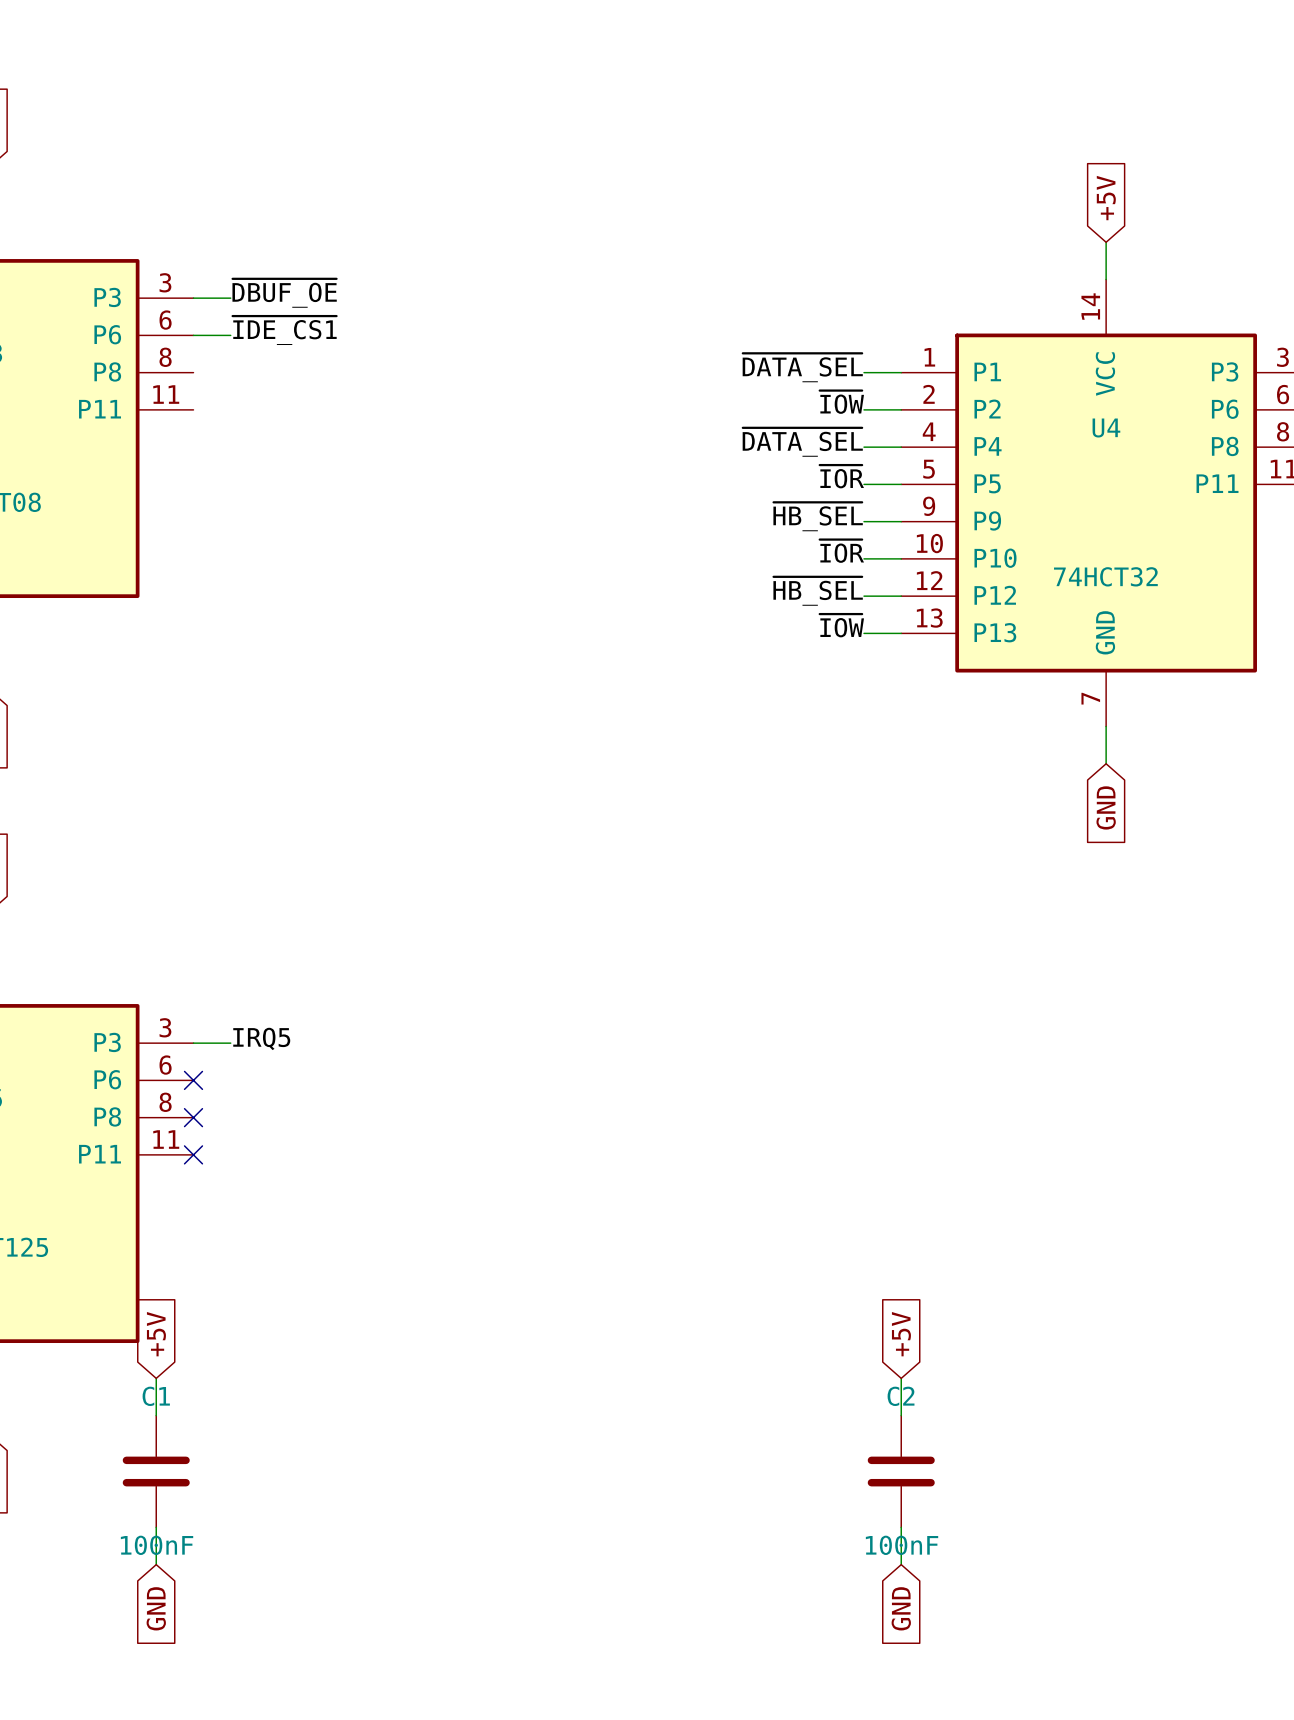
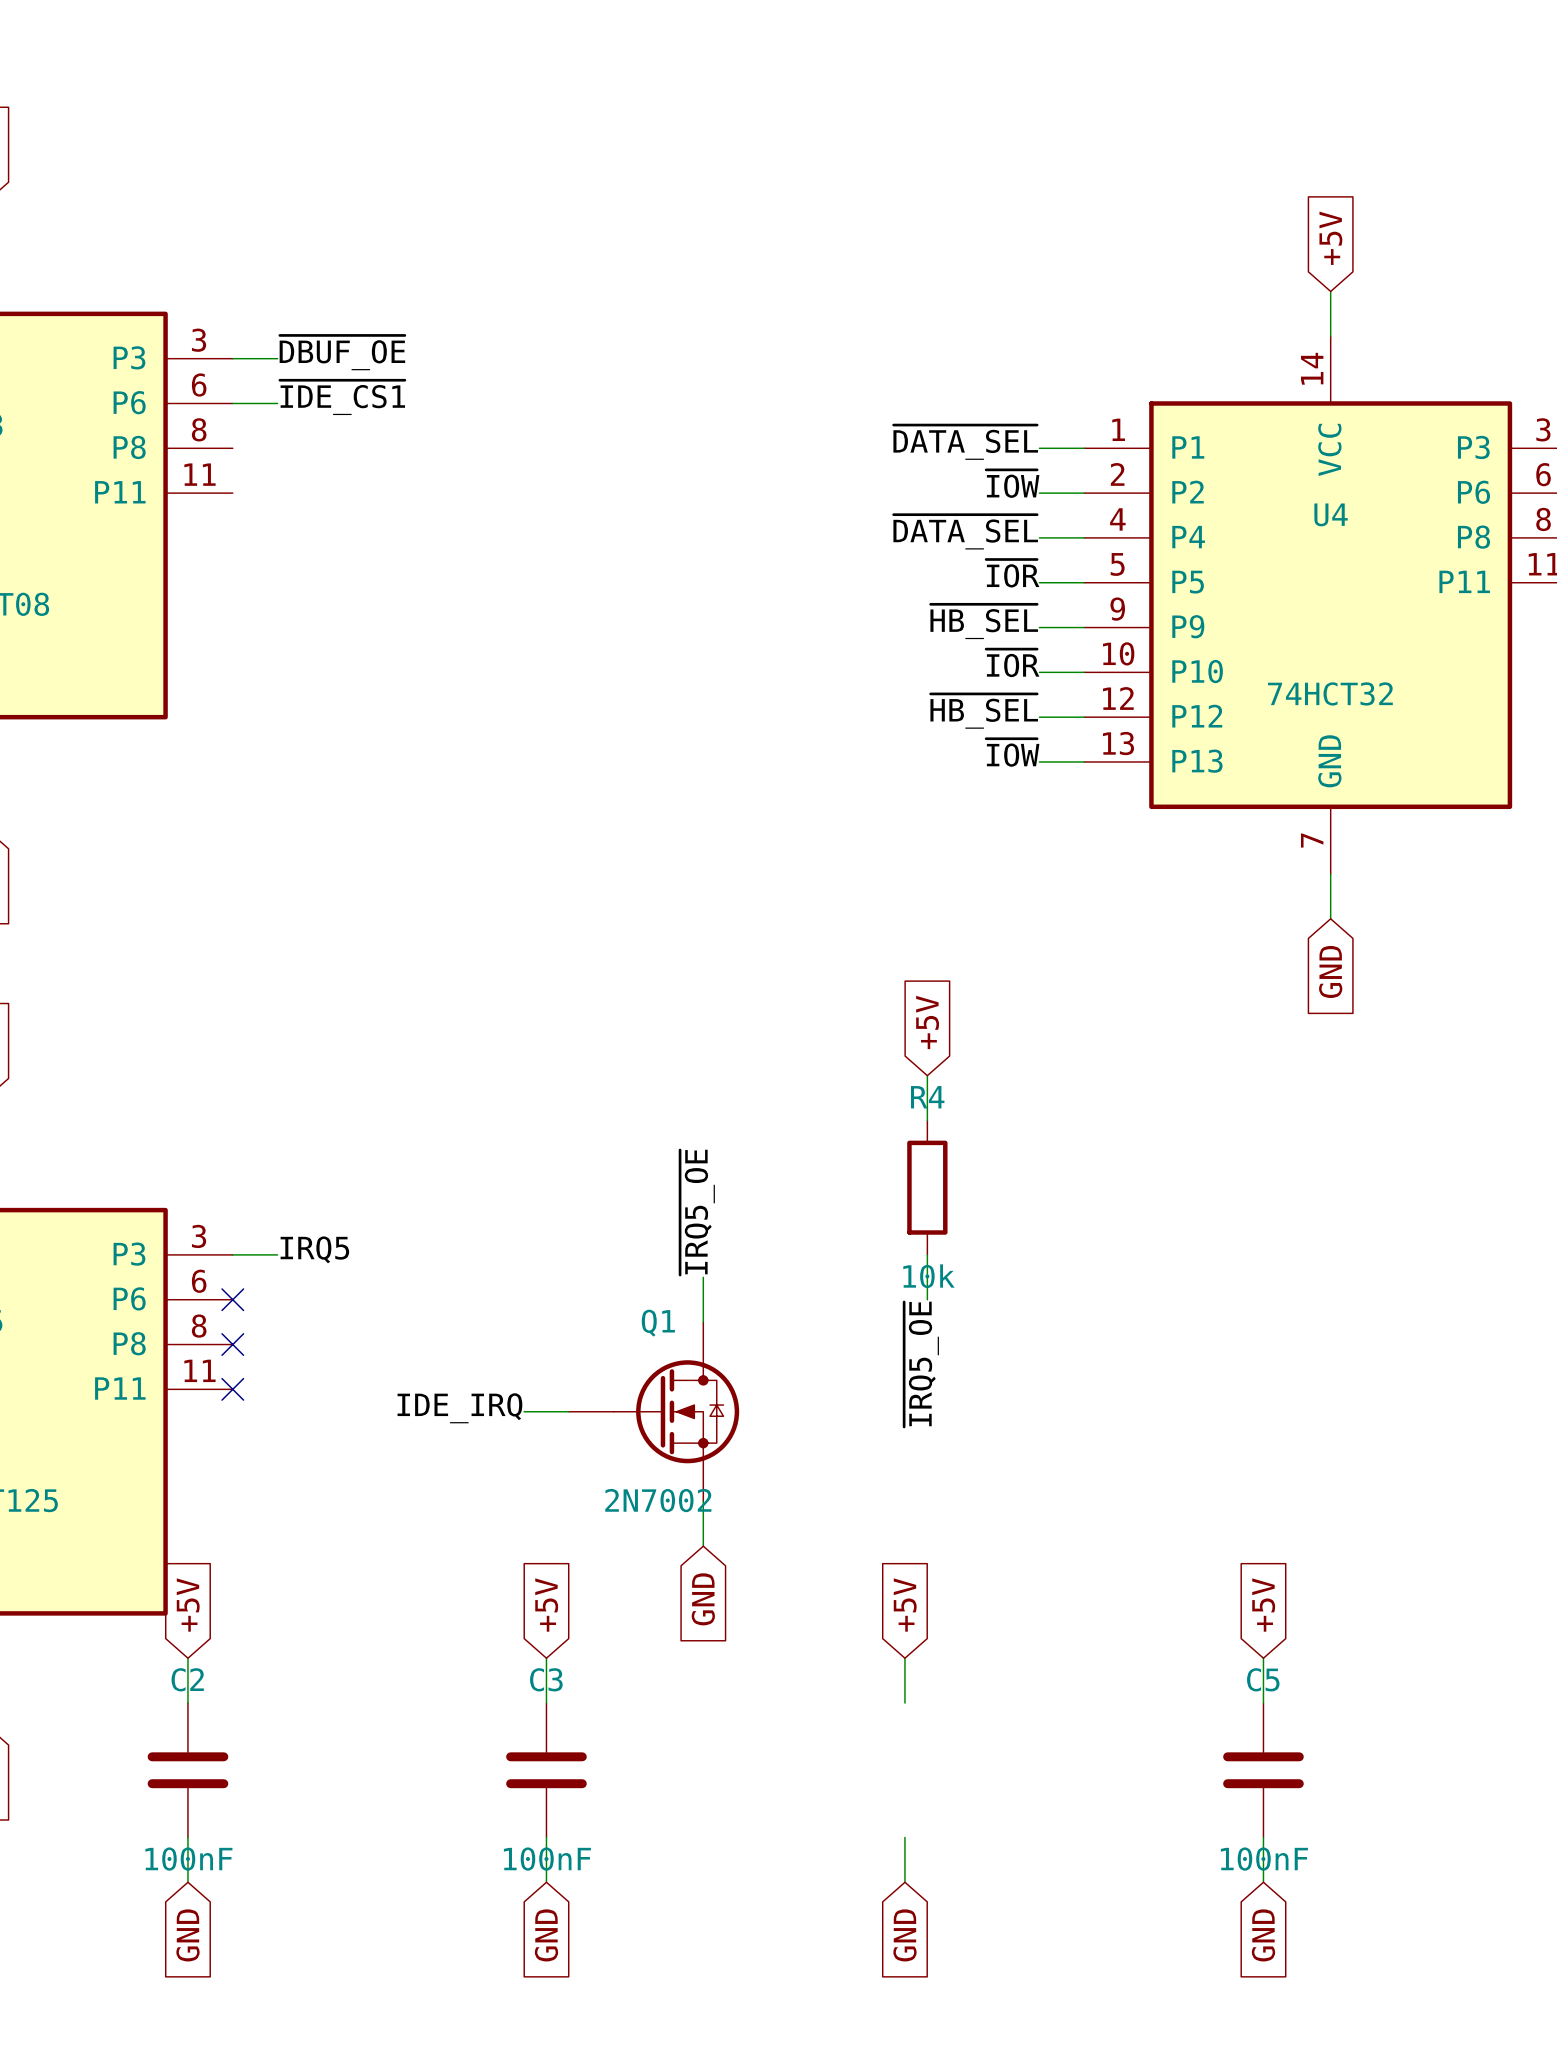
global label: none -> +5V (927, 1022)
wire: none -> (927, 1075) (927, 1120)
R4: none -> 10k (927, 1187)
label: none -> ~{IRQ5_OE} (697, 1212)
wire: none -> (927, 1254) (927, 1299)
wire: none -> (703, 1277) (703, 1322)
label: none -> ~{IRQ5_OE} (921, 1364)
label: none -> IDE_IRQ (459, 1408)
wire: none -> (524, 1411) (568, 1411)
Q1: none -> 2N7002 (654, 1411)
wire: none -> (703, 1501) (703, 1546)
global label: none -> GND (703, 1599)
global label: none -> +5V (546, 1605)
global label: none -> +5V (905, 1605)
global label: +5V (901, 1334) -> none
global label: none -> +5V (1263, 1605)
wire: none -> (546, 1658) (546, 1703)
wire: (901, 1378) (901, 1415) -> (904, 1658) (904, 1703)
wire: none -> (1263, 1658) (1263, 1703)
C1 name: C1 (156, 1396) -> C2 (187, 1679)
C3: none -> 100nF (546, 1770)
C2: 100nF (901, 1471) -> none
C5: none -> 100nF (1263, 1770)
wire: none -> (546, 1837) (546, 1882)
wire: (901, 1527) (901, 1564) -> (904, 1837) (904, 1882)
wire: none -> (1263, 1837) (1263, 1882)
global label: none -> GND (546, 1935)
global label: none -> GND (904, 1935)
global label: GND (901, 1608) -> none
global label: none -> GND (1263, 1935)

